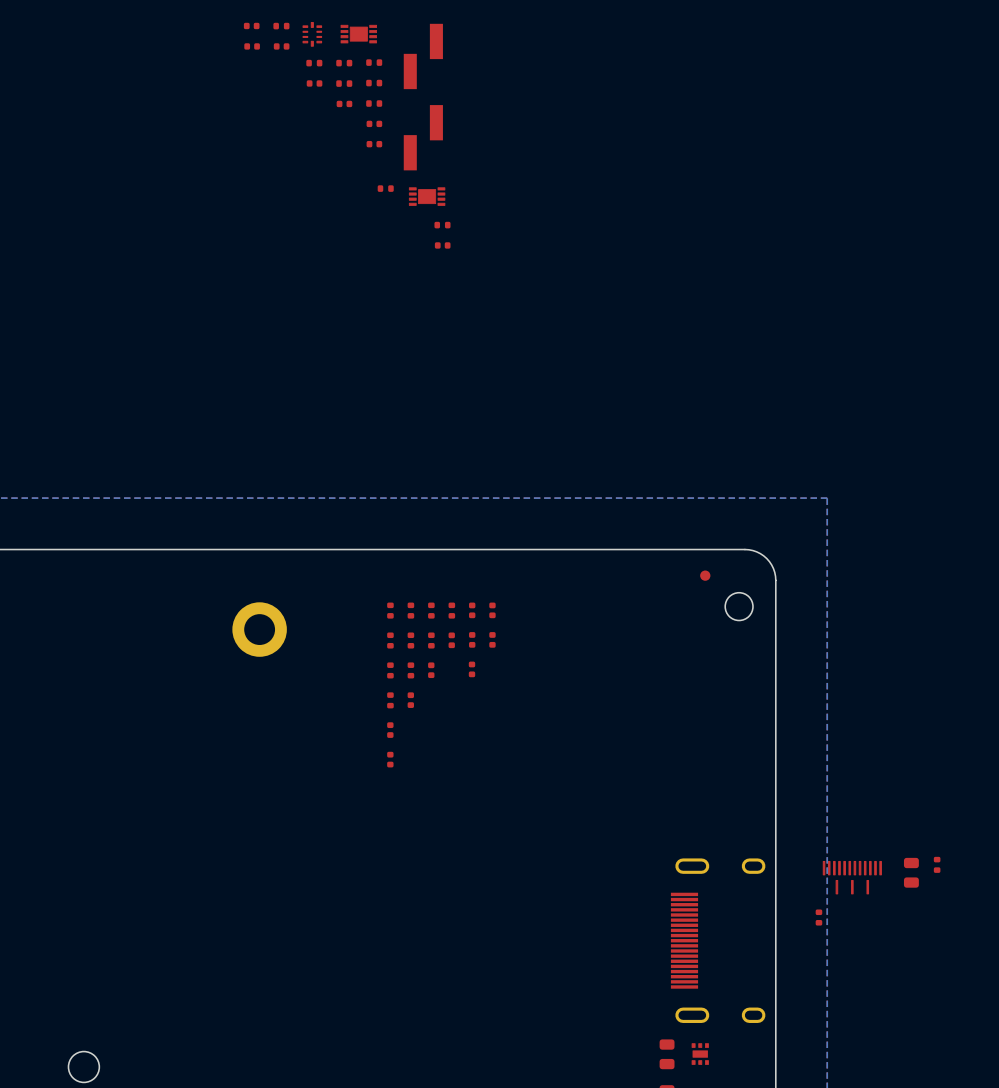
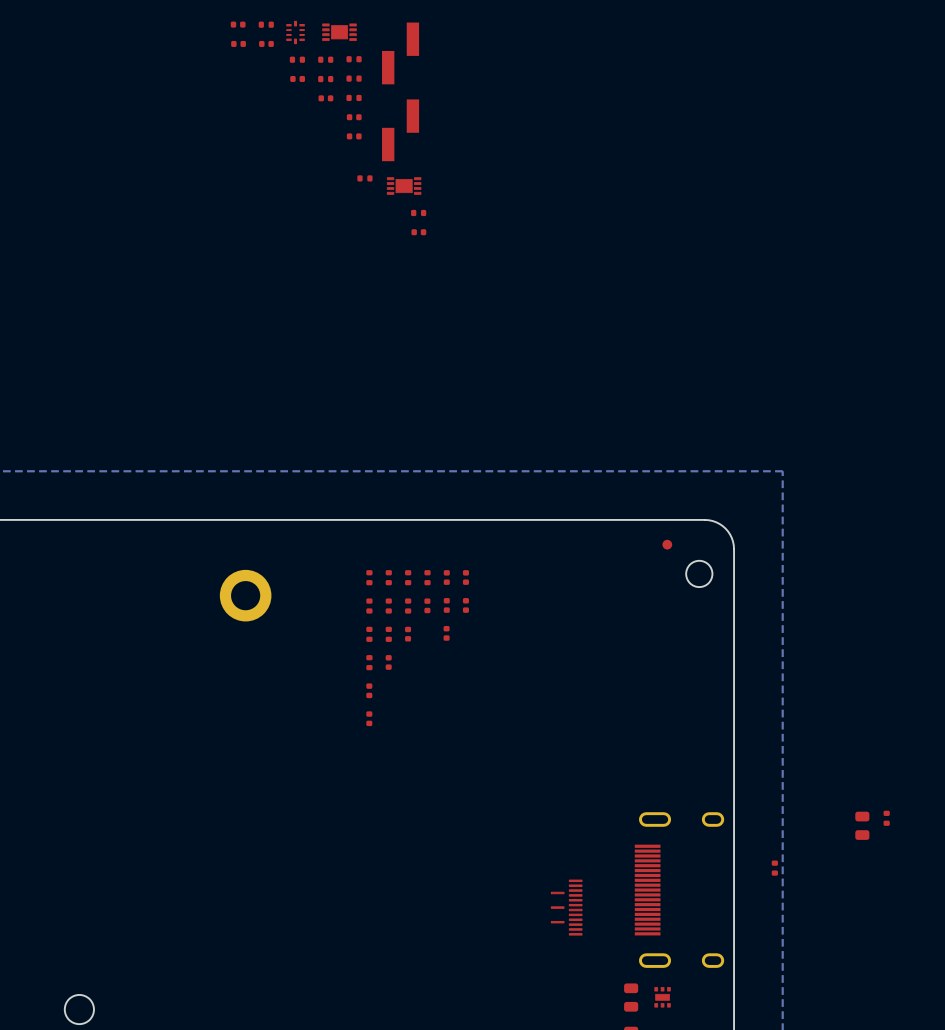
part: (852, 877) -> none
part: none -> (566, 907)

